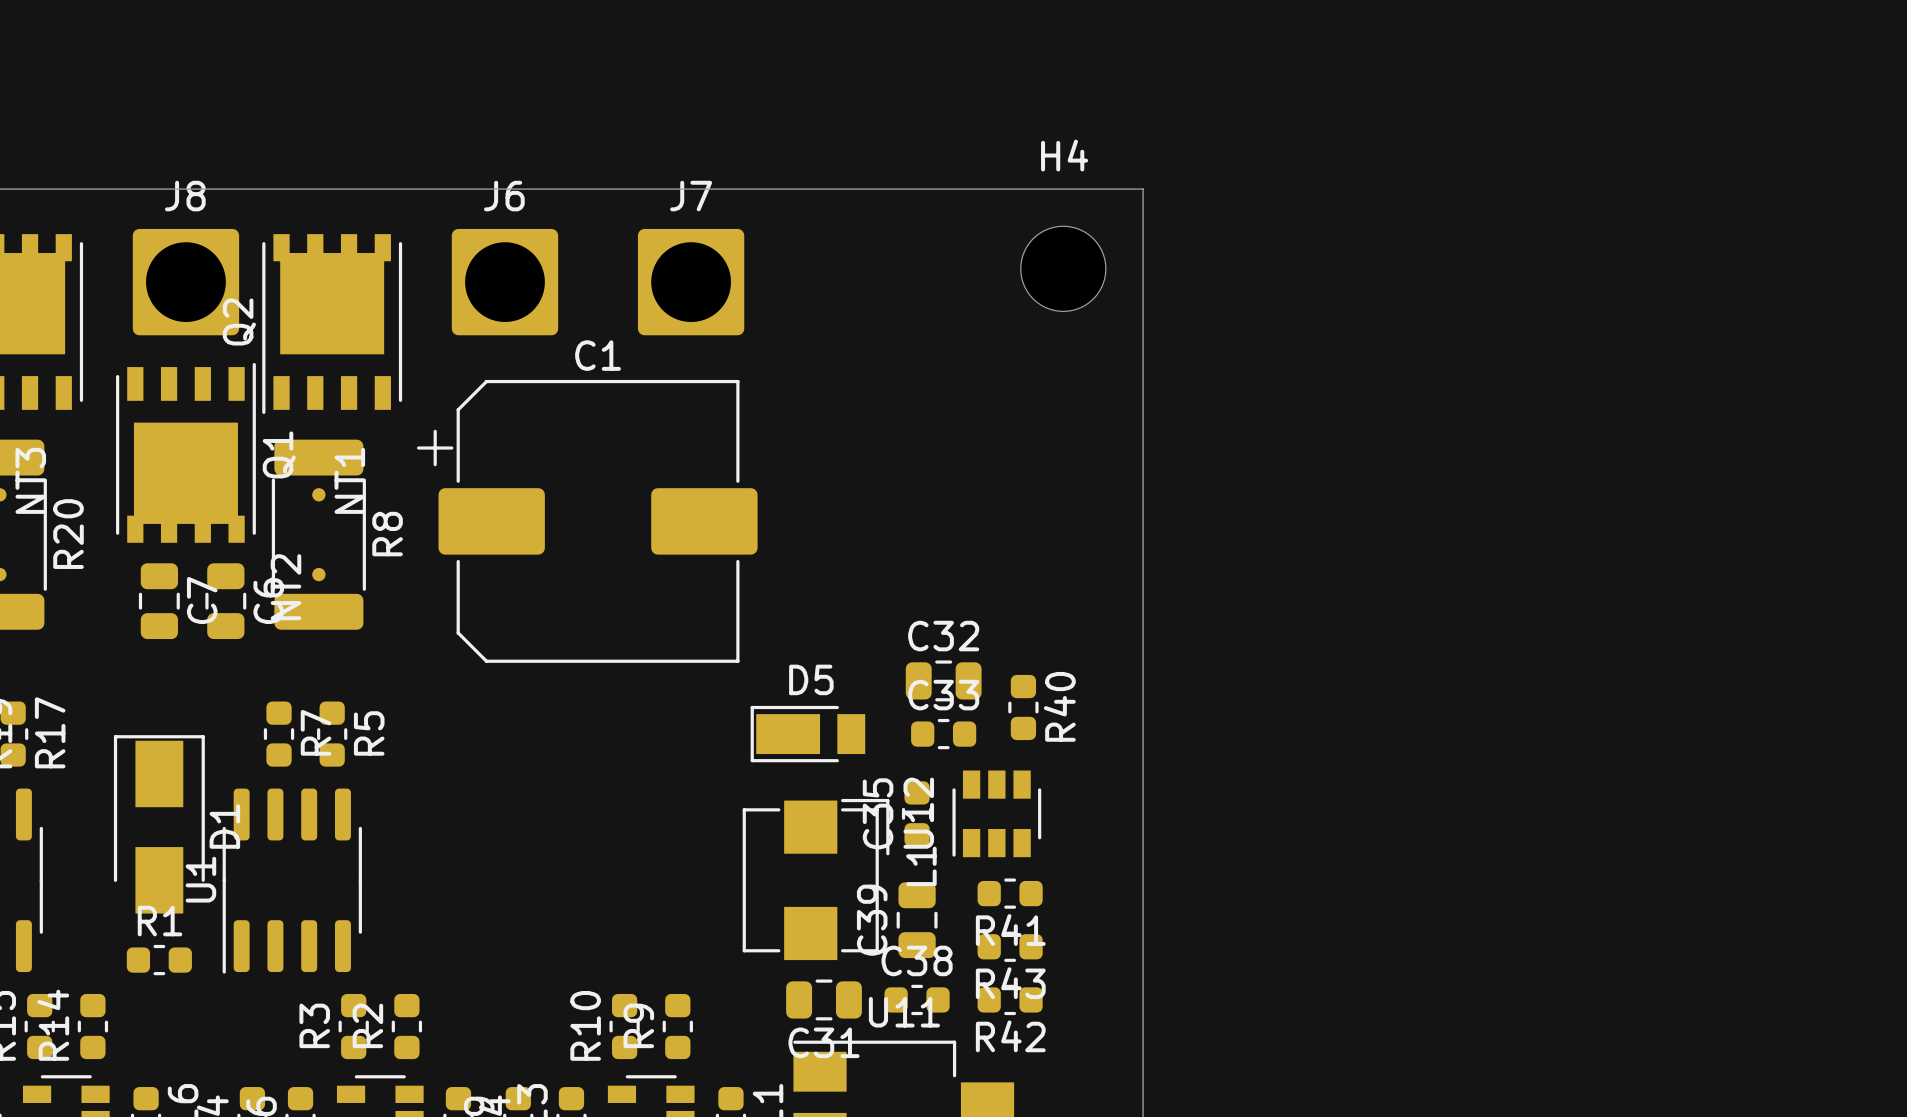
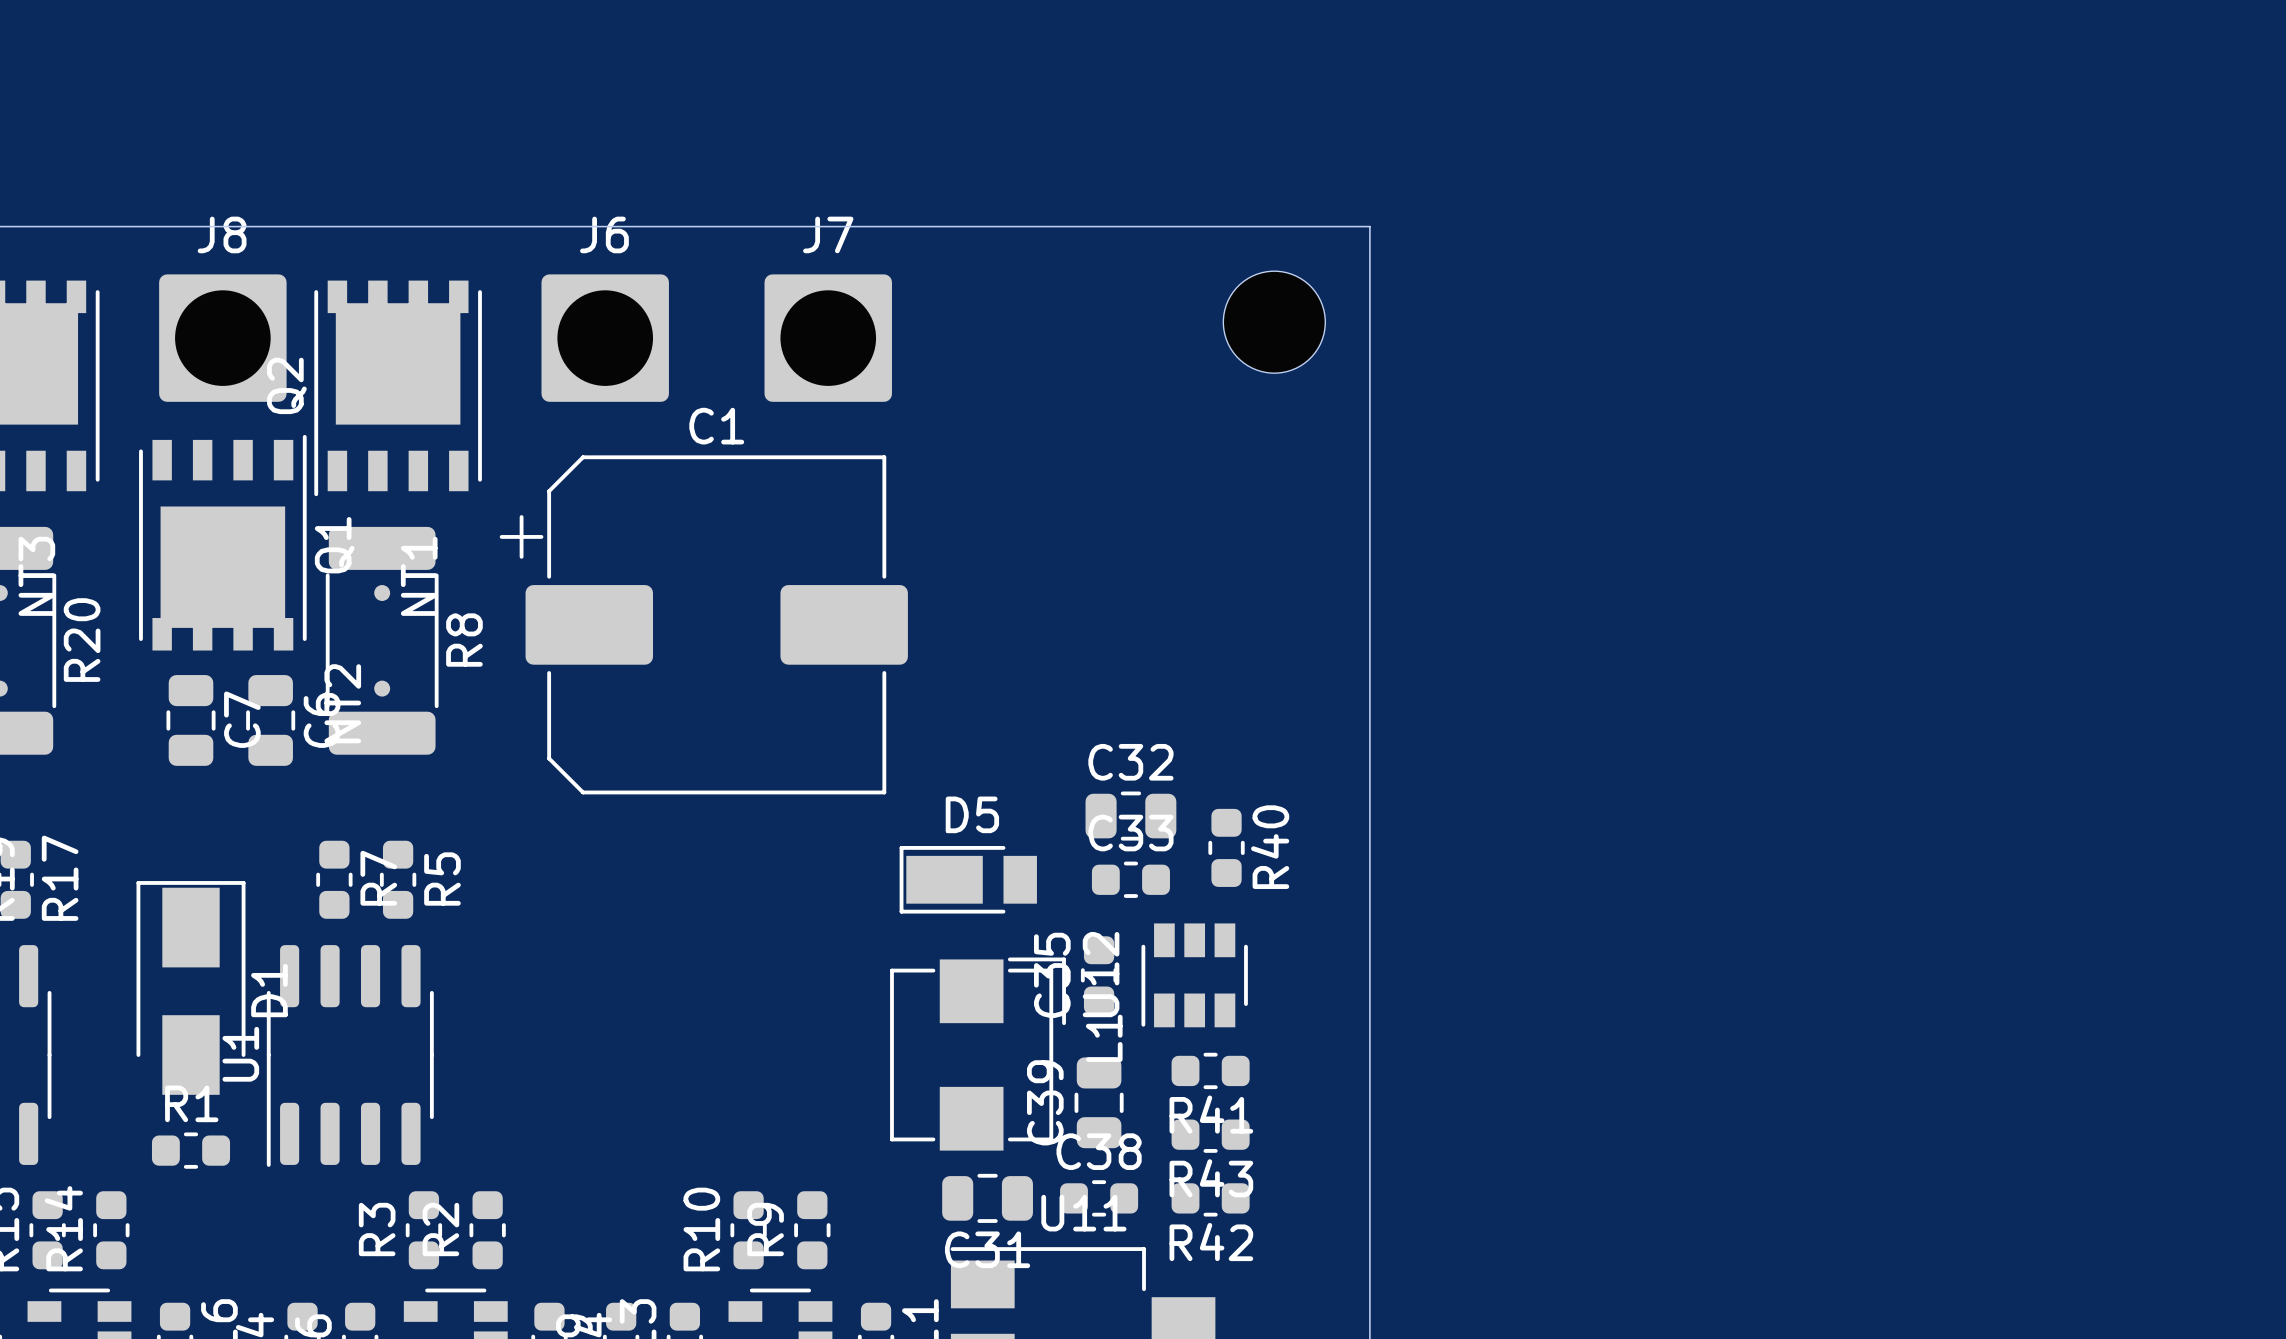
H4 name: H4 (1064, 155) -> none

